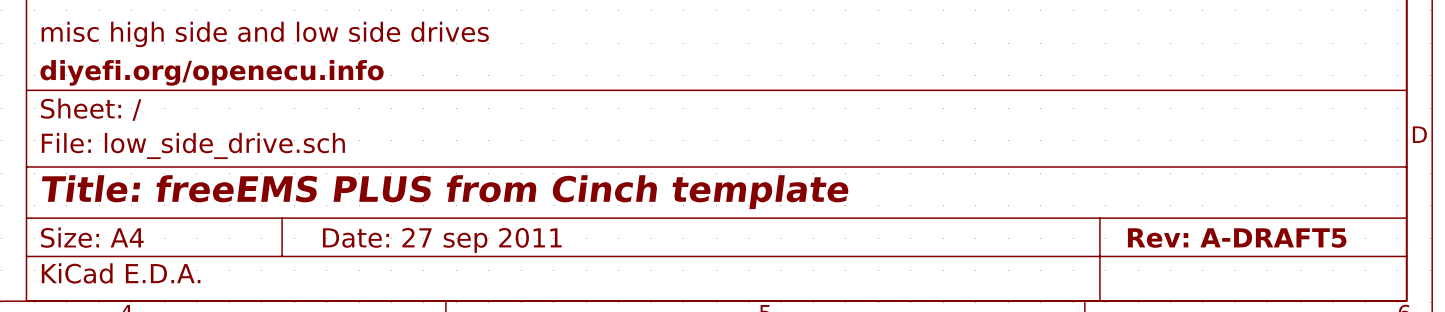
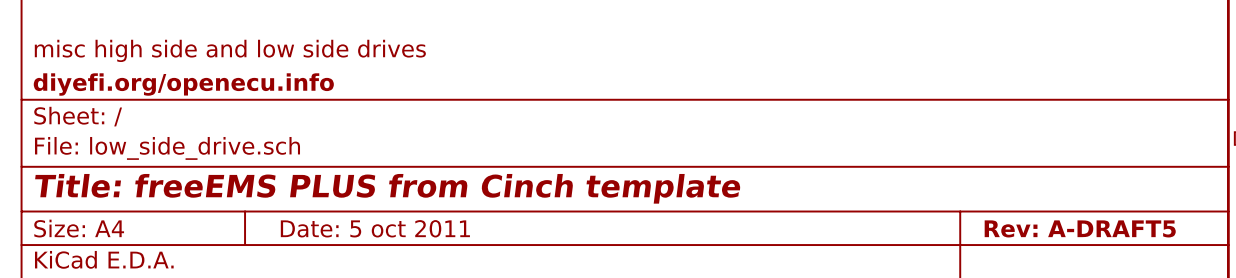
title block: Date: 27 sep 2011 (442, 240) -> Date: 5 oct 2011 (375, 228)

